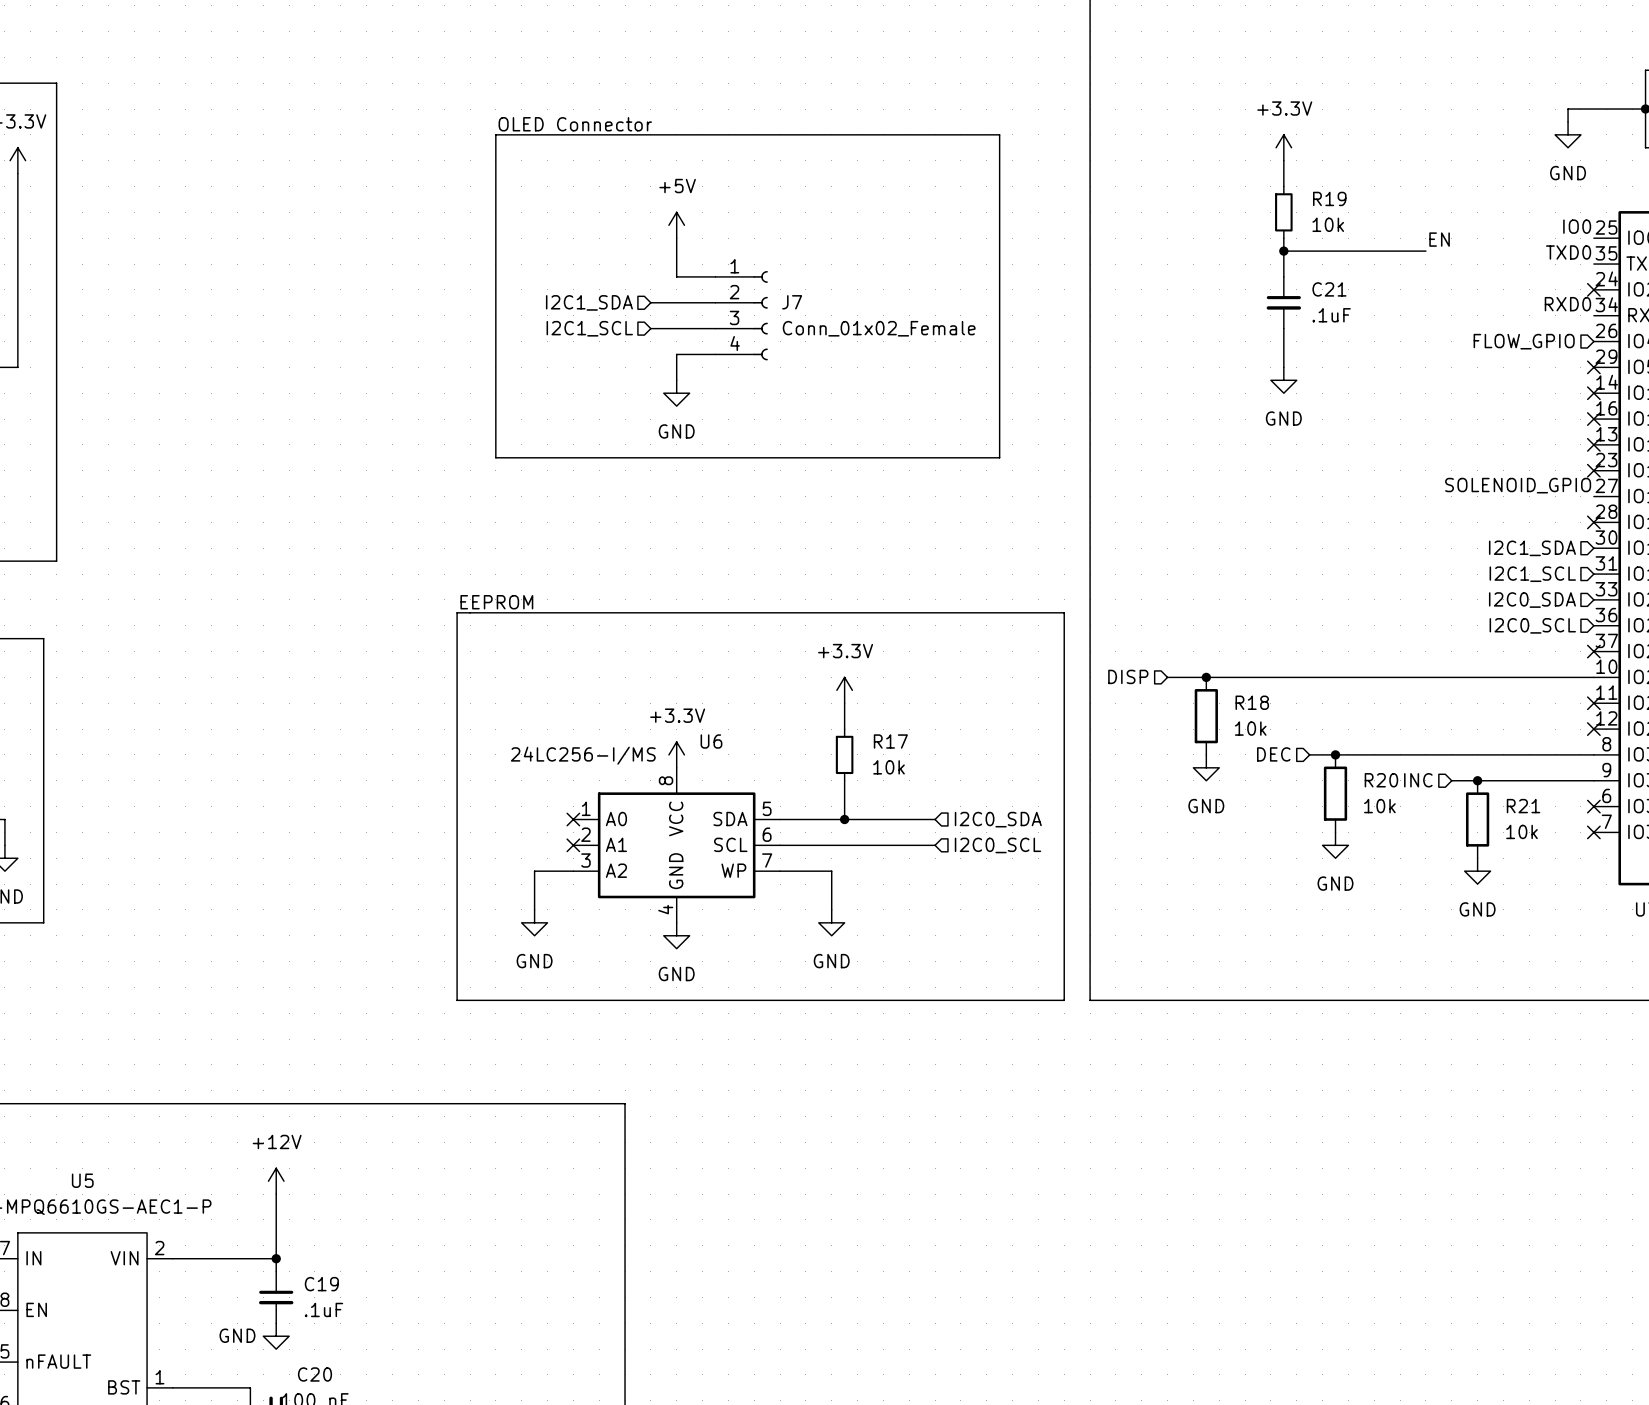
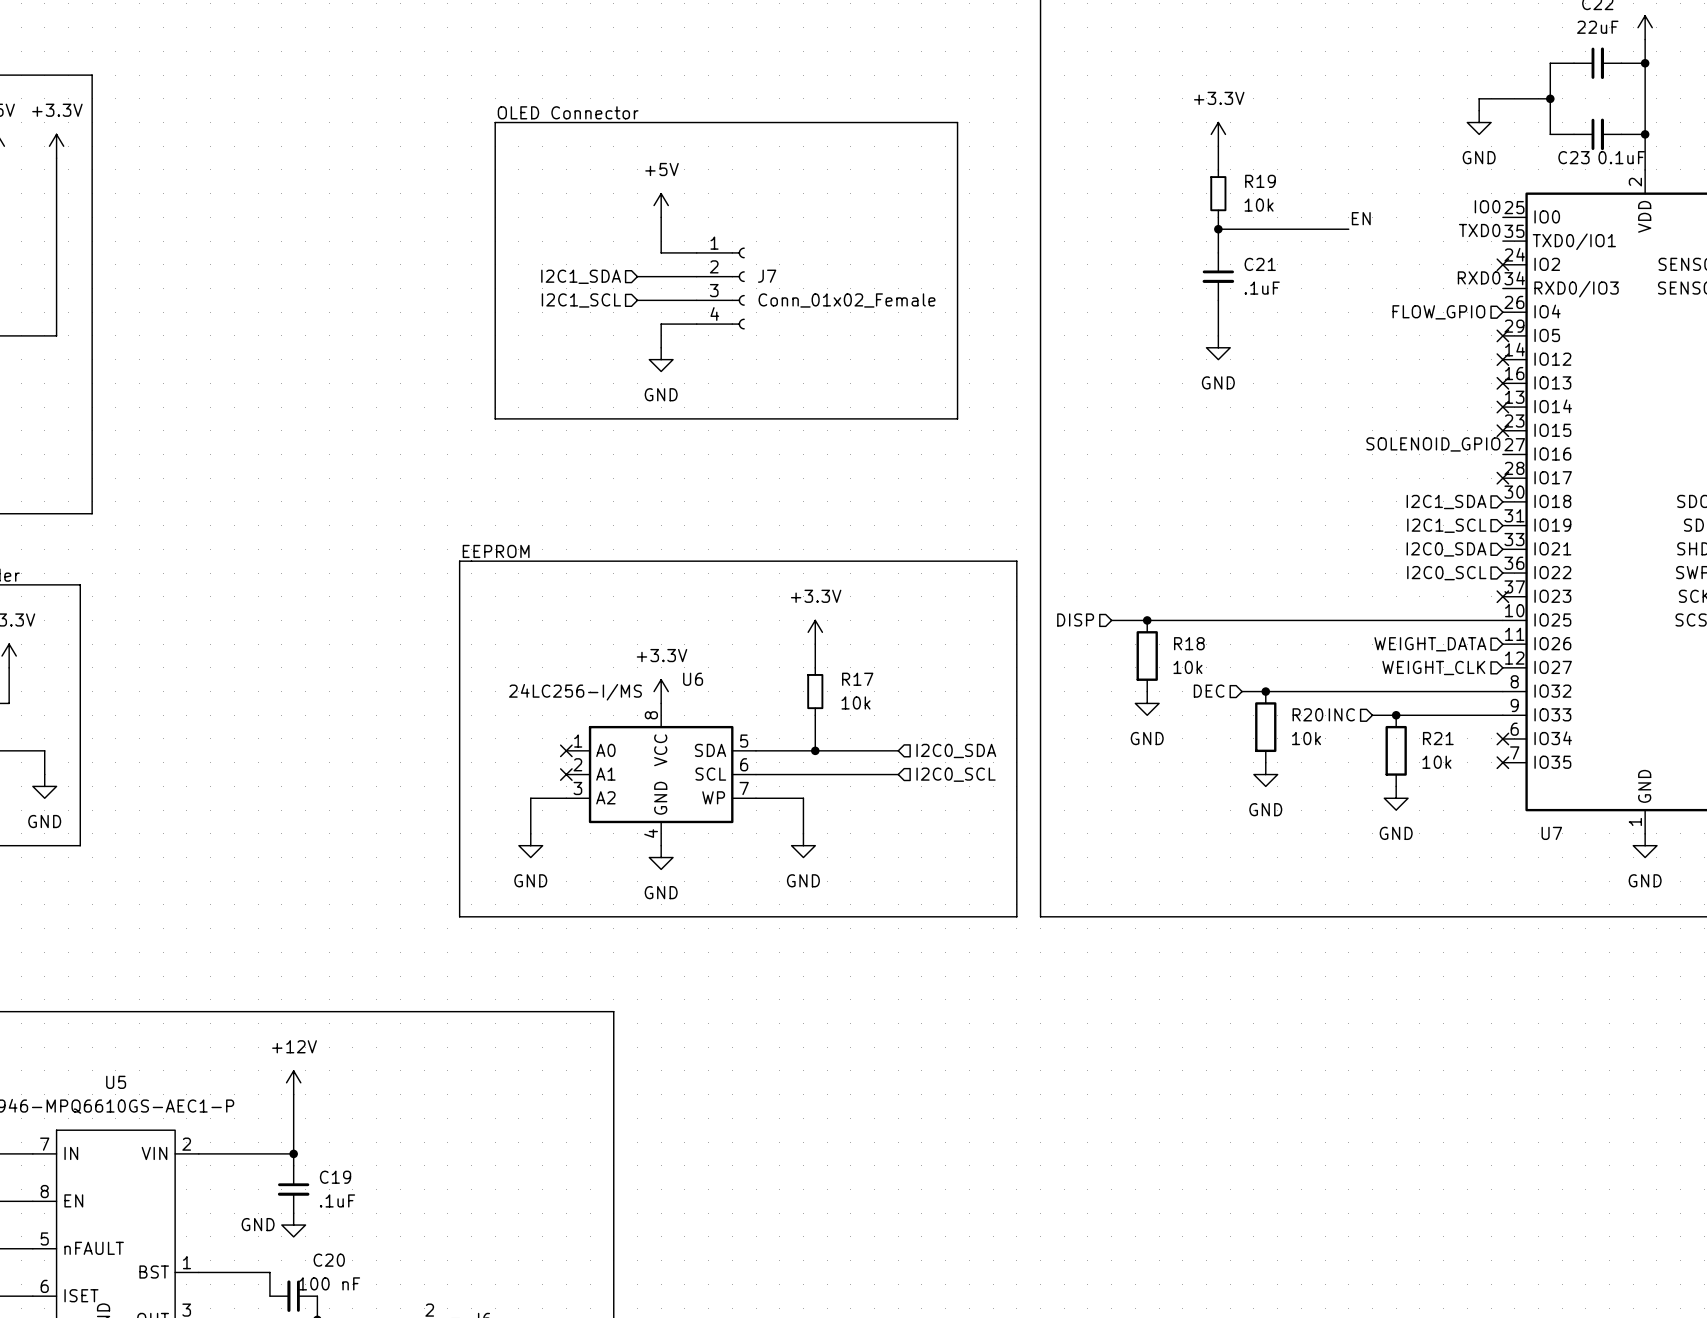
hierarchical label: none -> WEIGHT_DATA (1430, 644)
no-connect mark: (1593, 703) -> none
hierarchical label: none -> WEIGHT_CLK (1433, 667)
no-connect mark: (1593, 729) -> none

